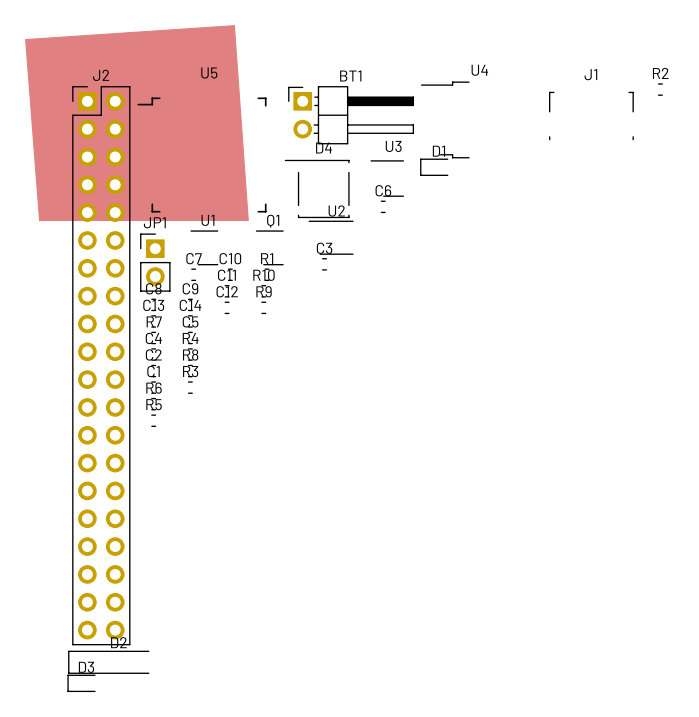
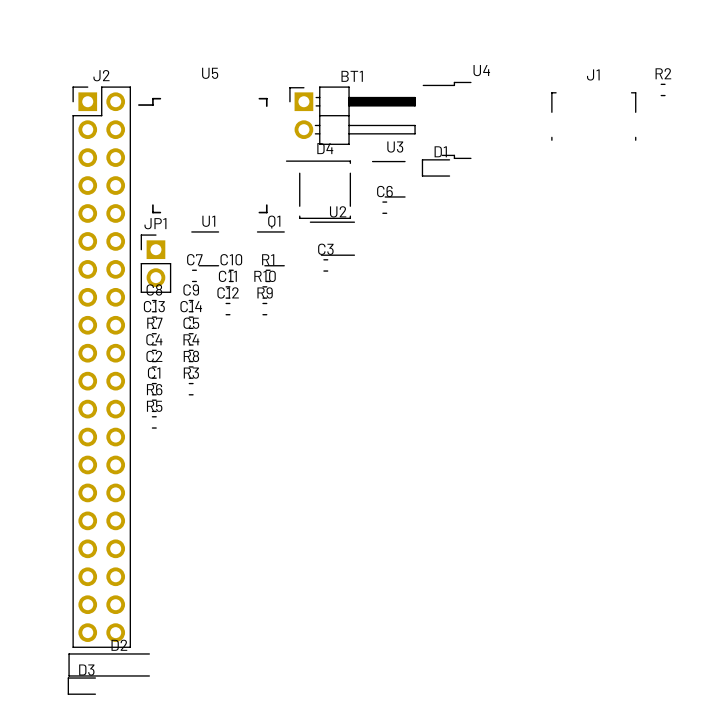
drawing: [25, 25, 249, 222] -> none

